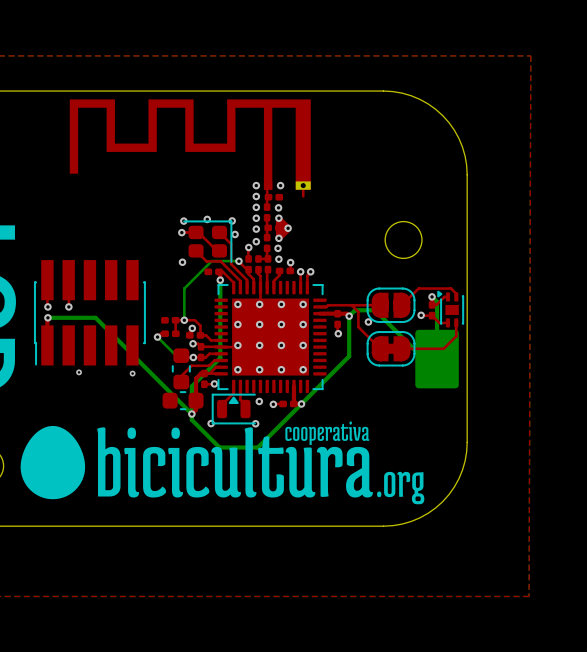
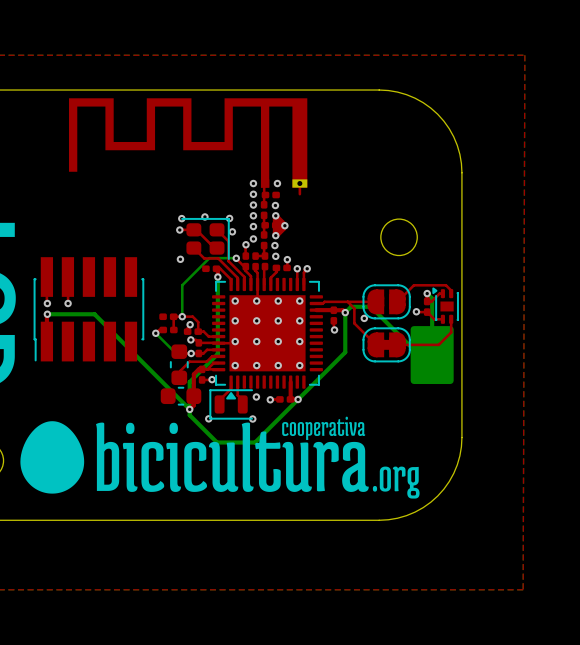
via: (79, 372) -> none
via: (132, 373) -> none

